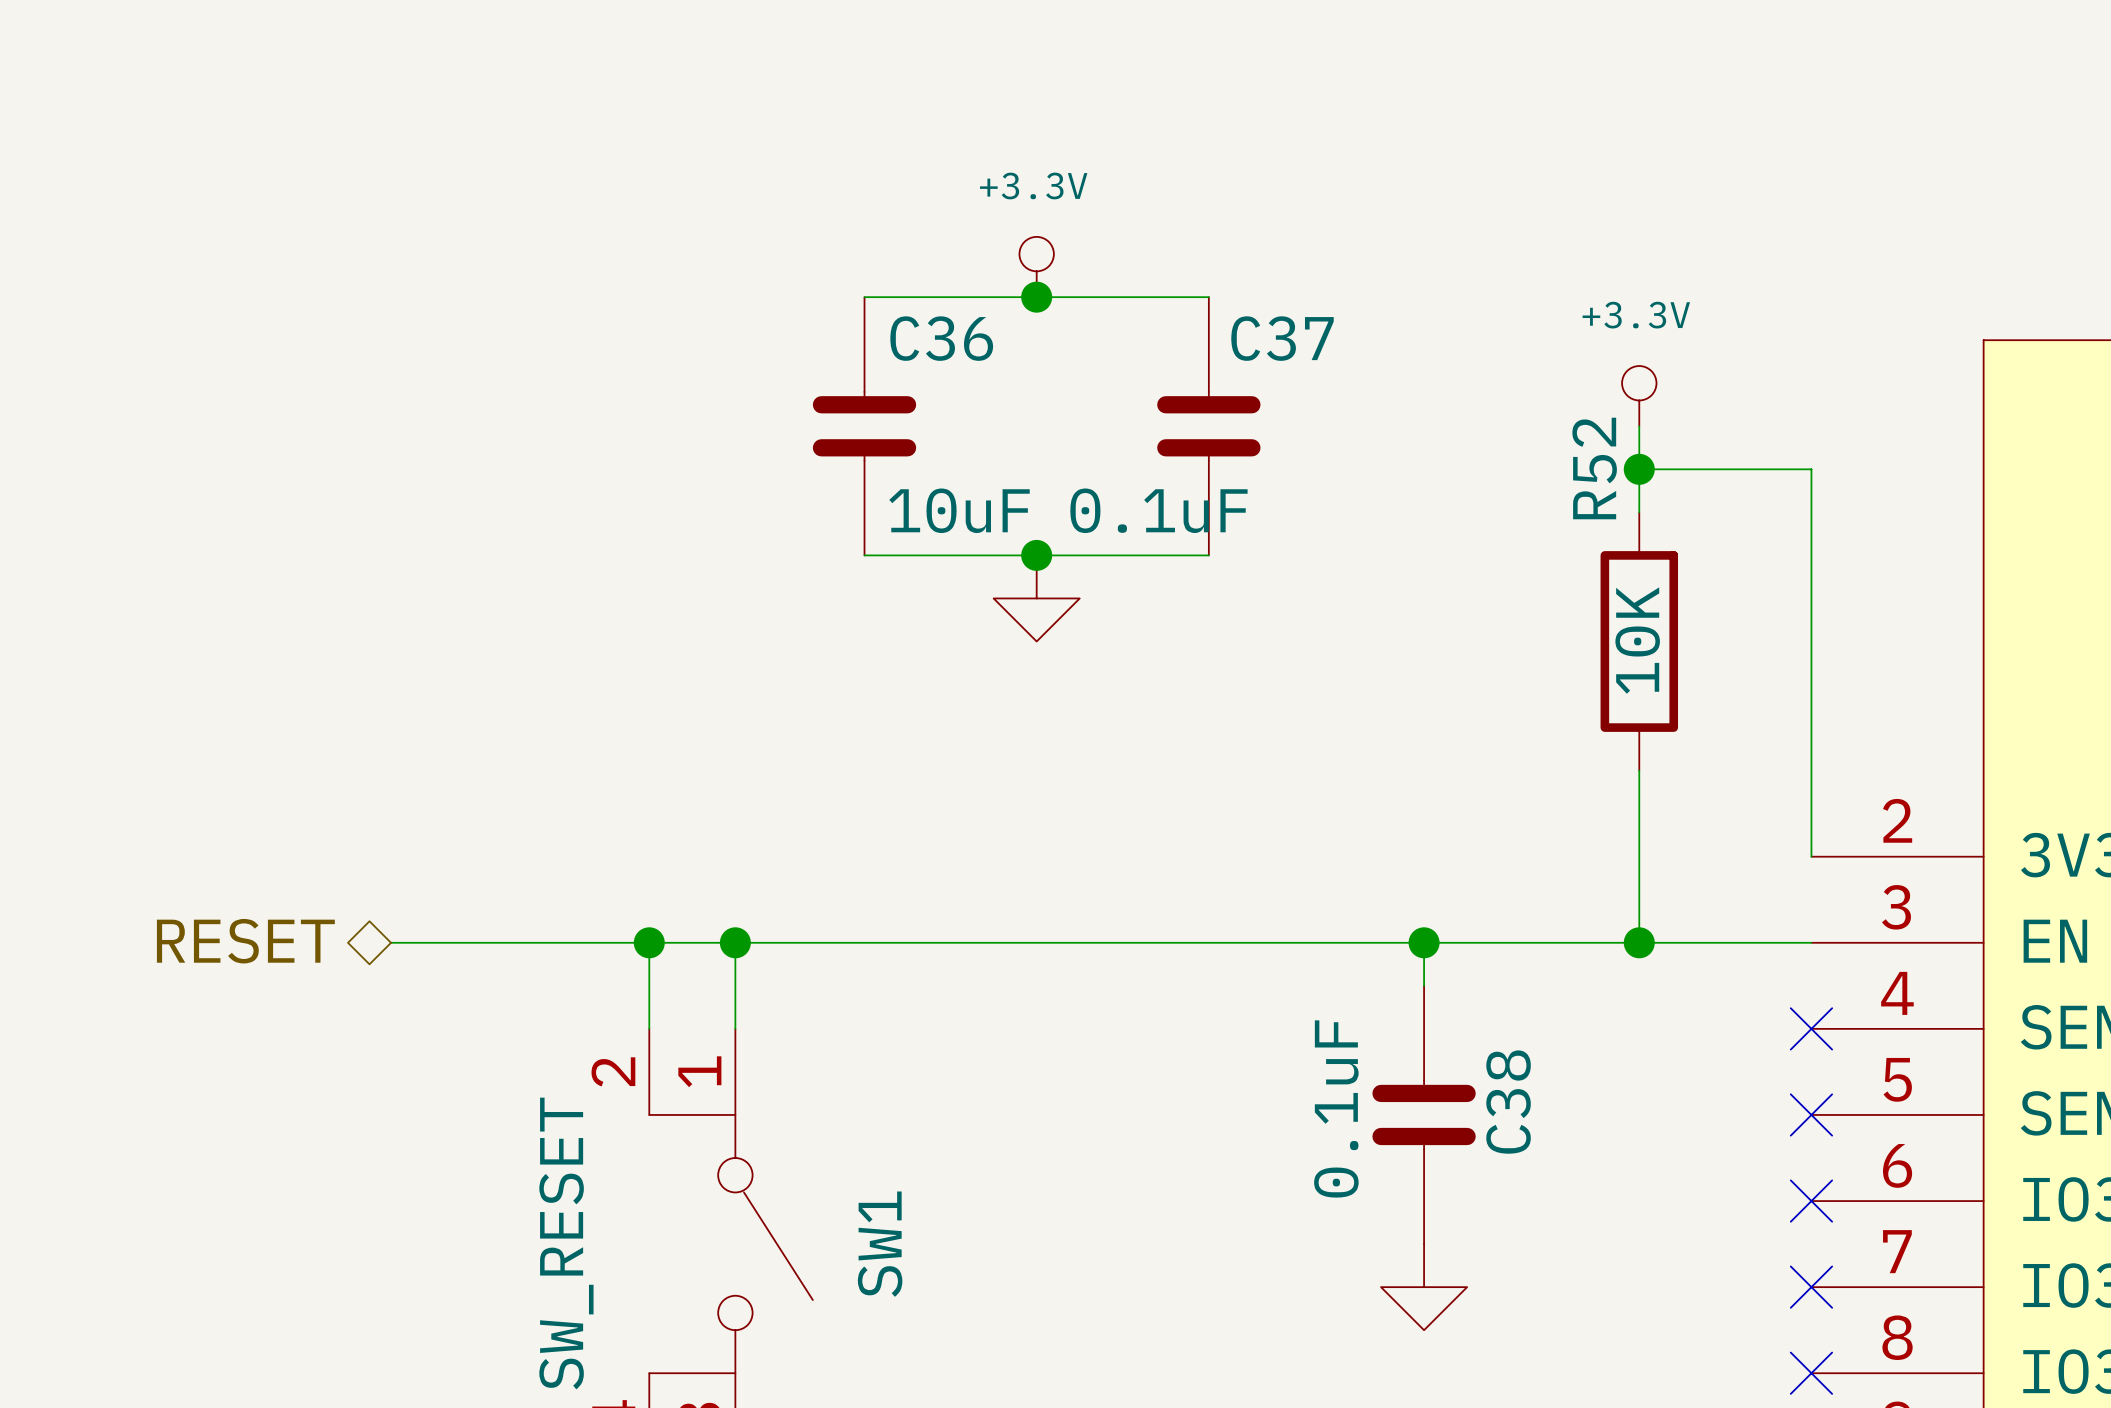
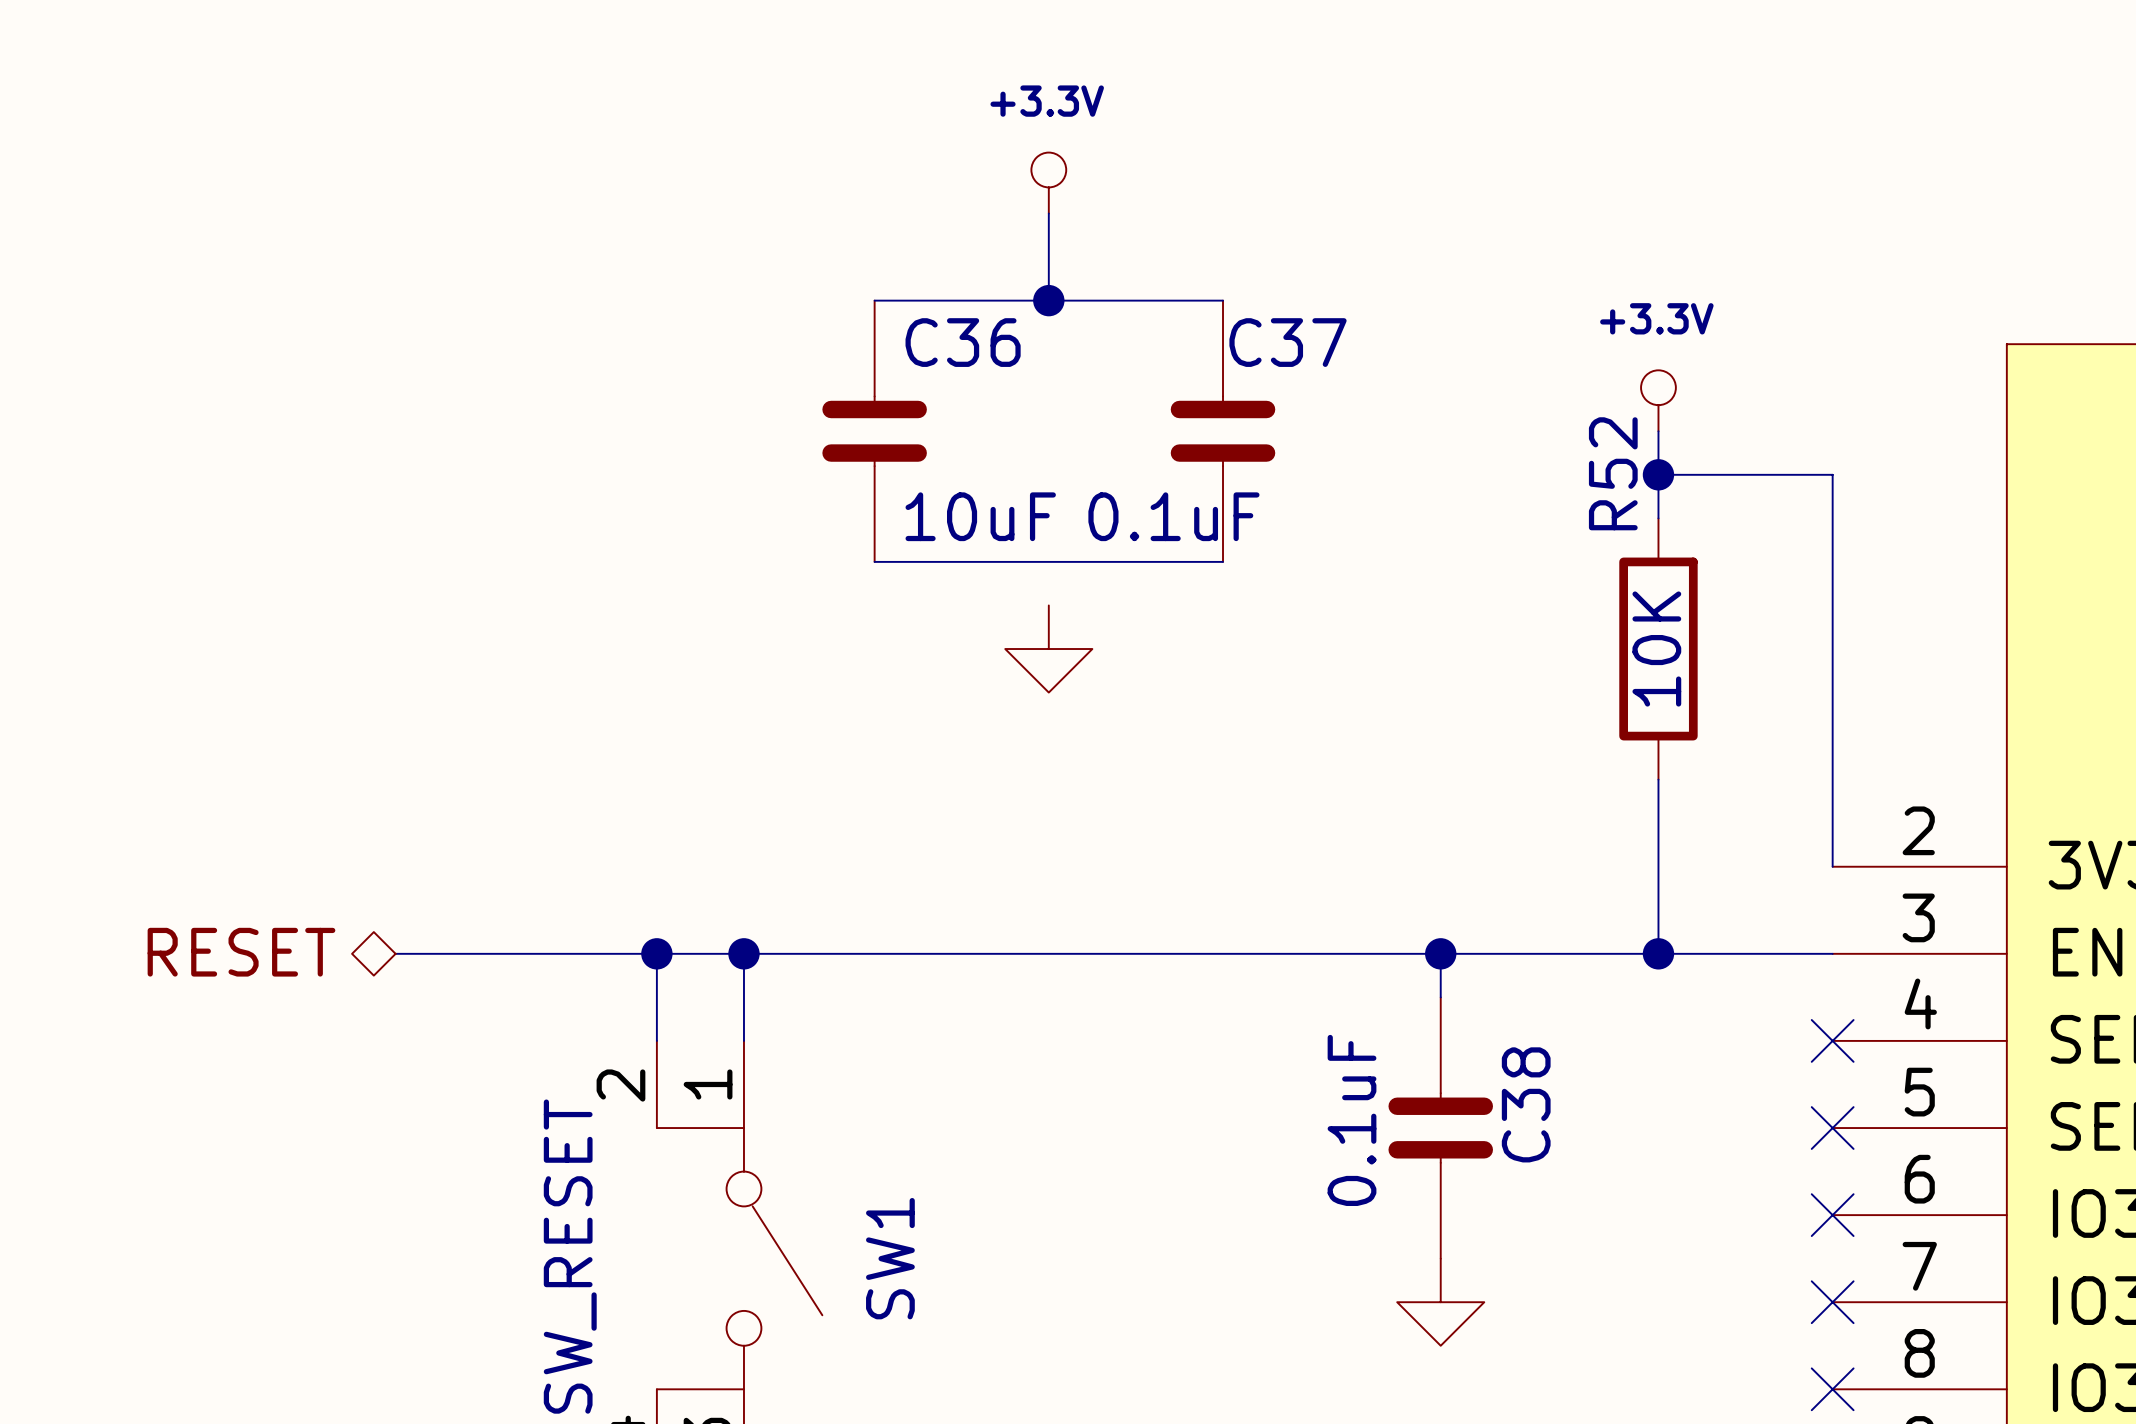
wire: none -> (1048, 213) (1048, 300)
power symbol position: +3.3V (1036, 267) -> +3.3V (1048, 183)
junction: (1036, 555) -> none
power symbol position: (1036, 598) -> (1048, 649)

